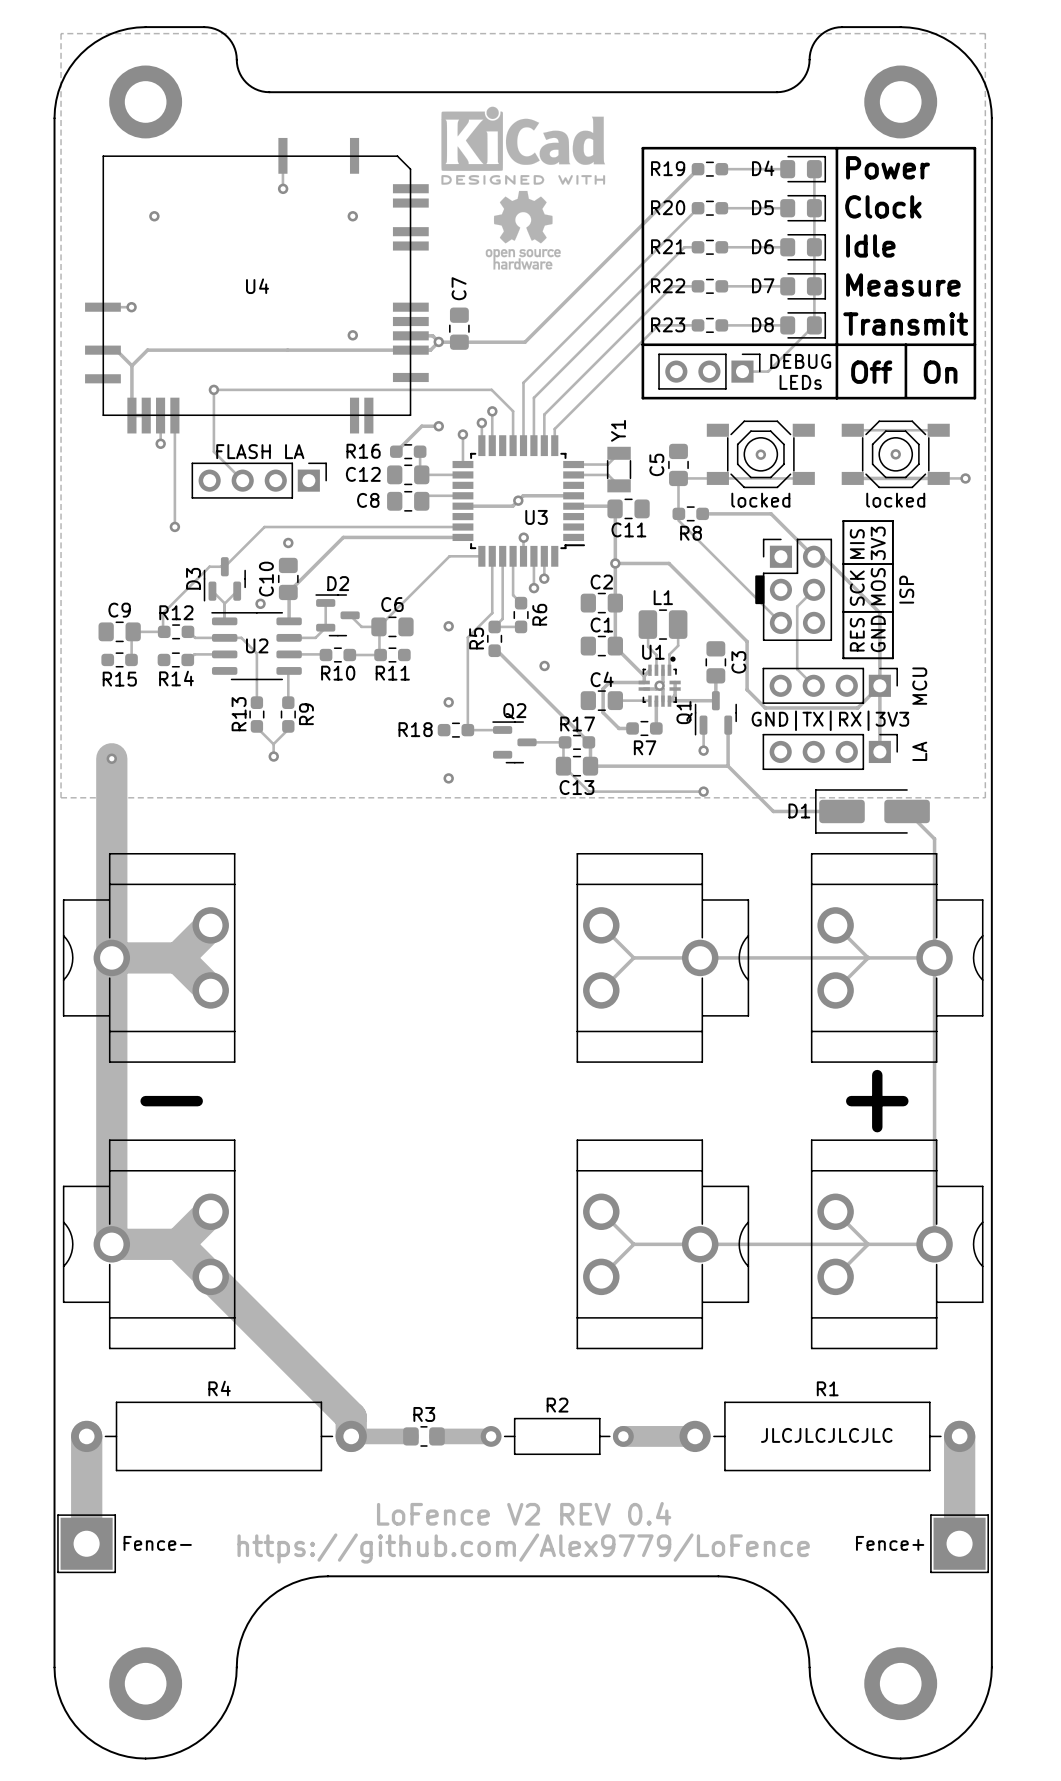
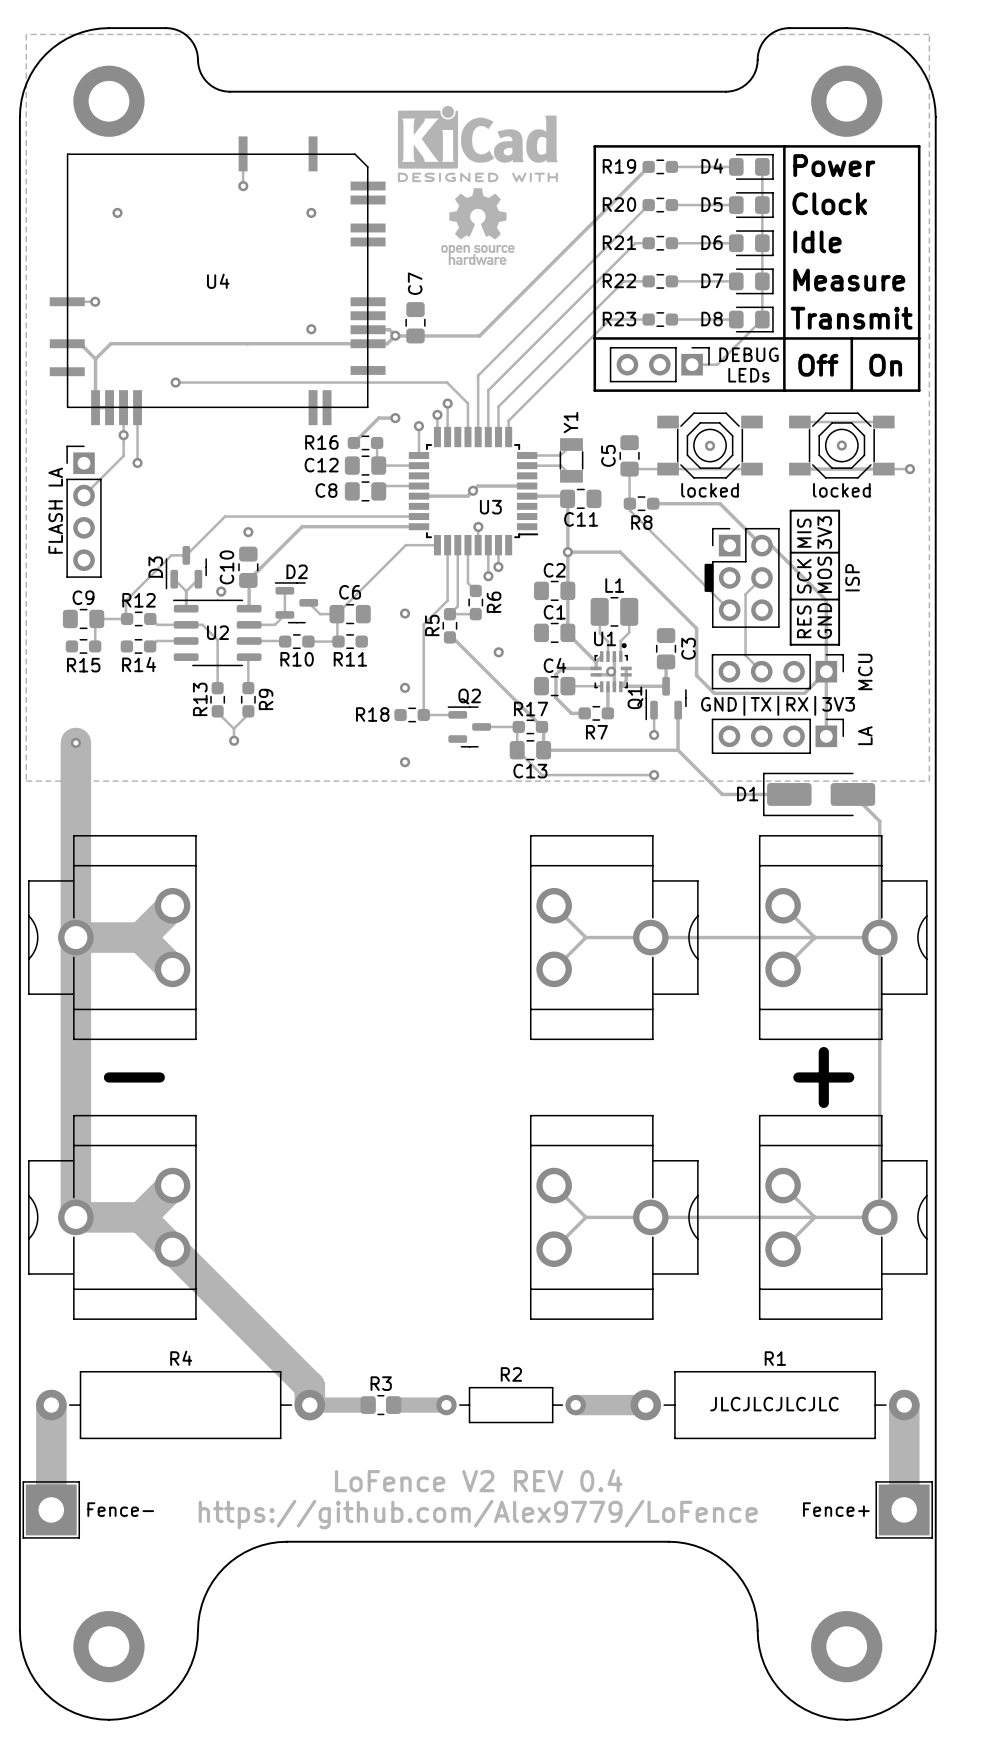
track: (213, 389) (213, 451) (242, 480) -> none
track: none -> (123, 435) (123, 455) (84, 495)
text rotation: 0° (260, 451) -> 90° counterclockwise (55, 510)
text position: FLASH LA (260, 451) -> FLASH LA (55, 510)
track: (174, 472) (174, 526) -> none
part rotation: 0° (259, 480) -> 90° counterclockwise (84, 511)
part position: (259, 480) -> (84, 511)
via position: (174, 526) -> (137, 462)

